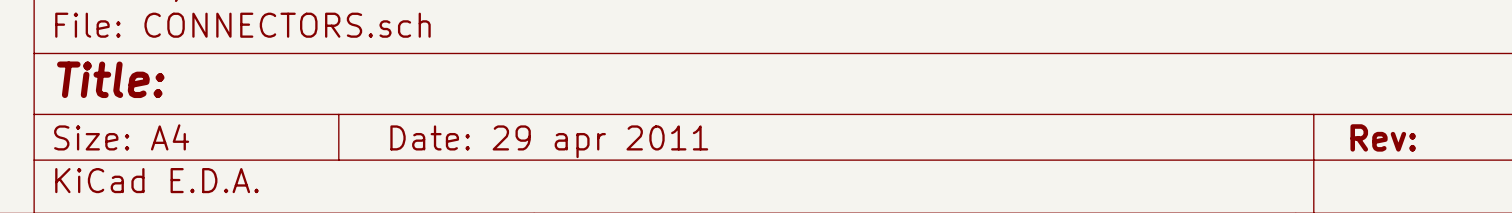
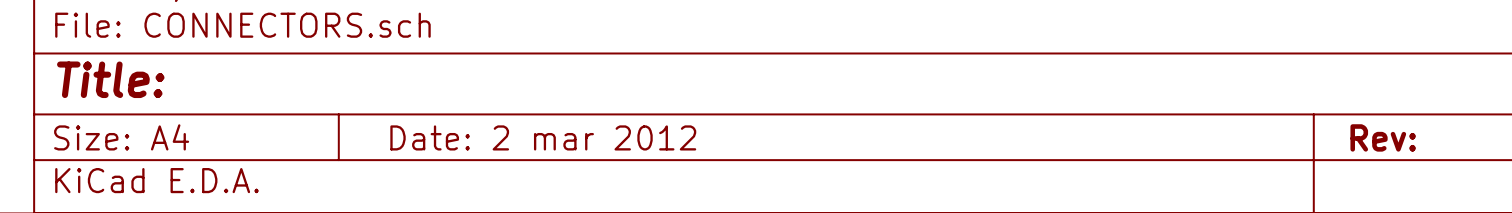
title block: Date: 29 apr 2011 (549, 141) -> Date: 2 mar 2012 (543, 137)

